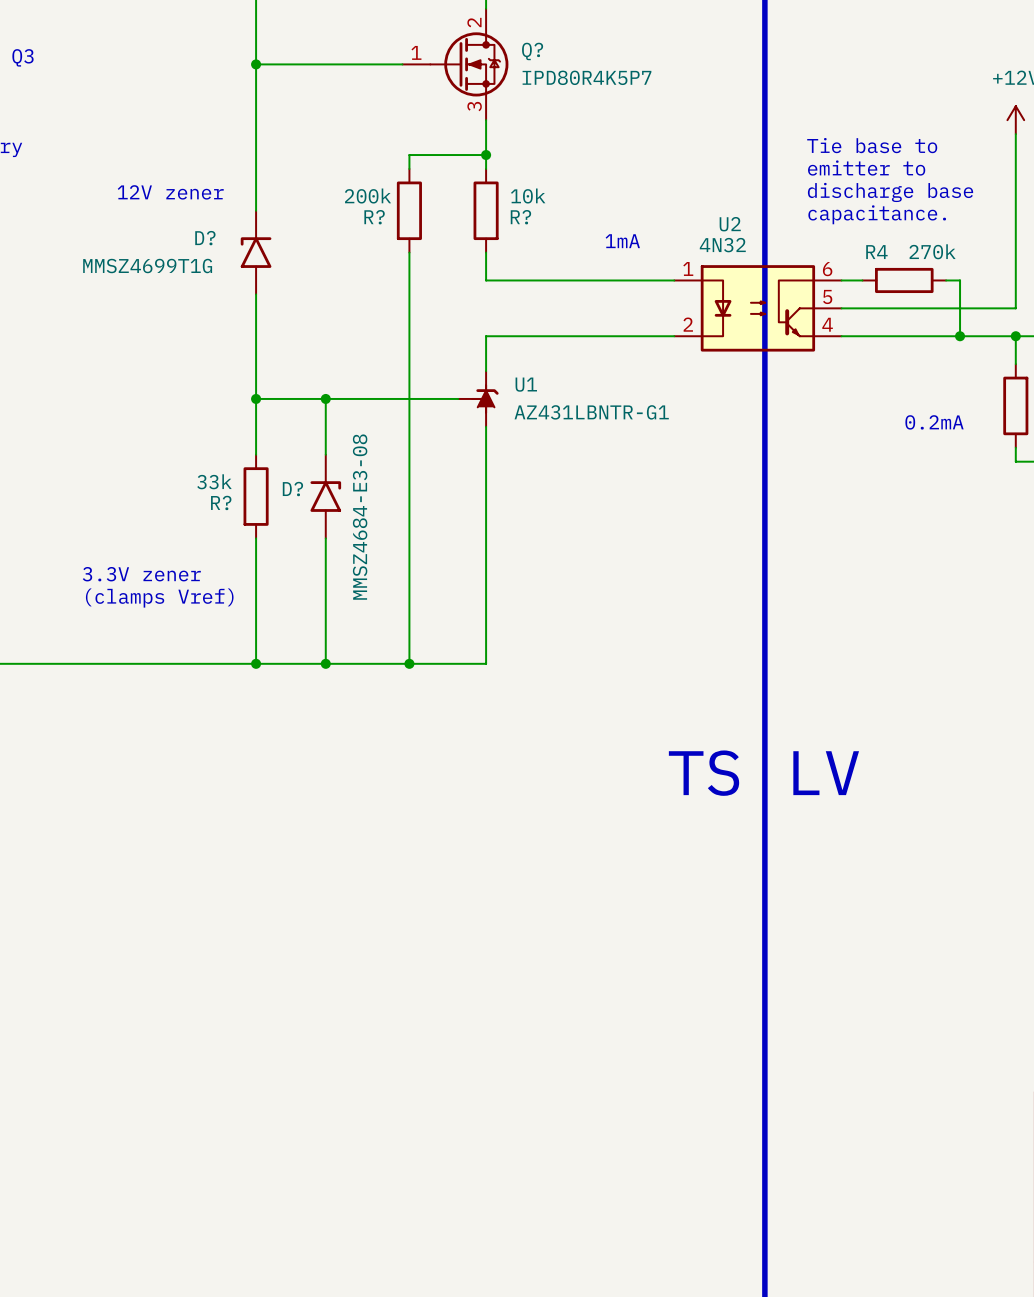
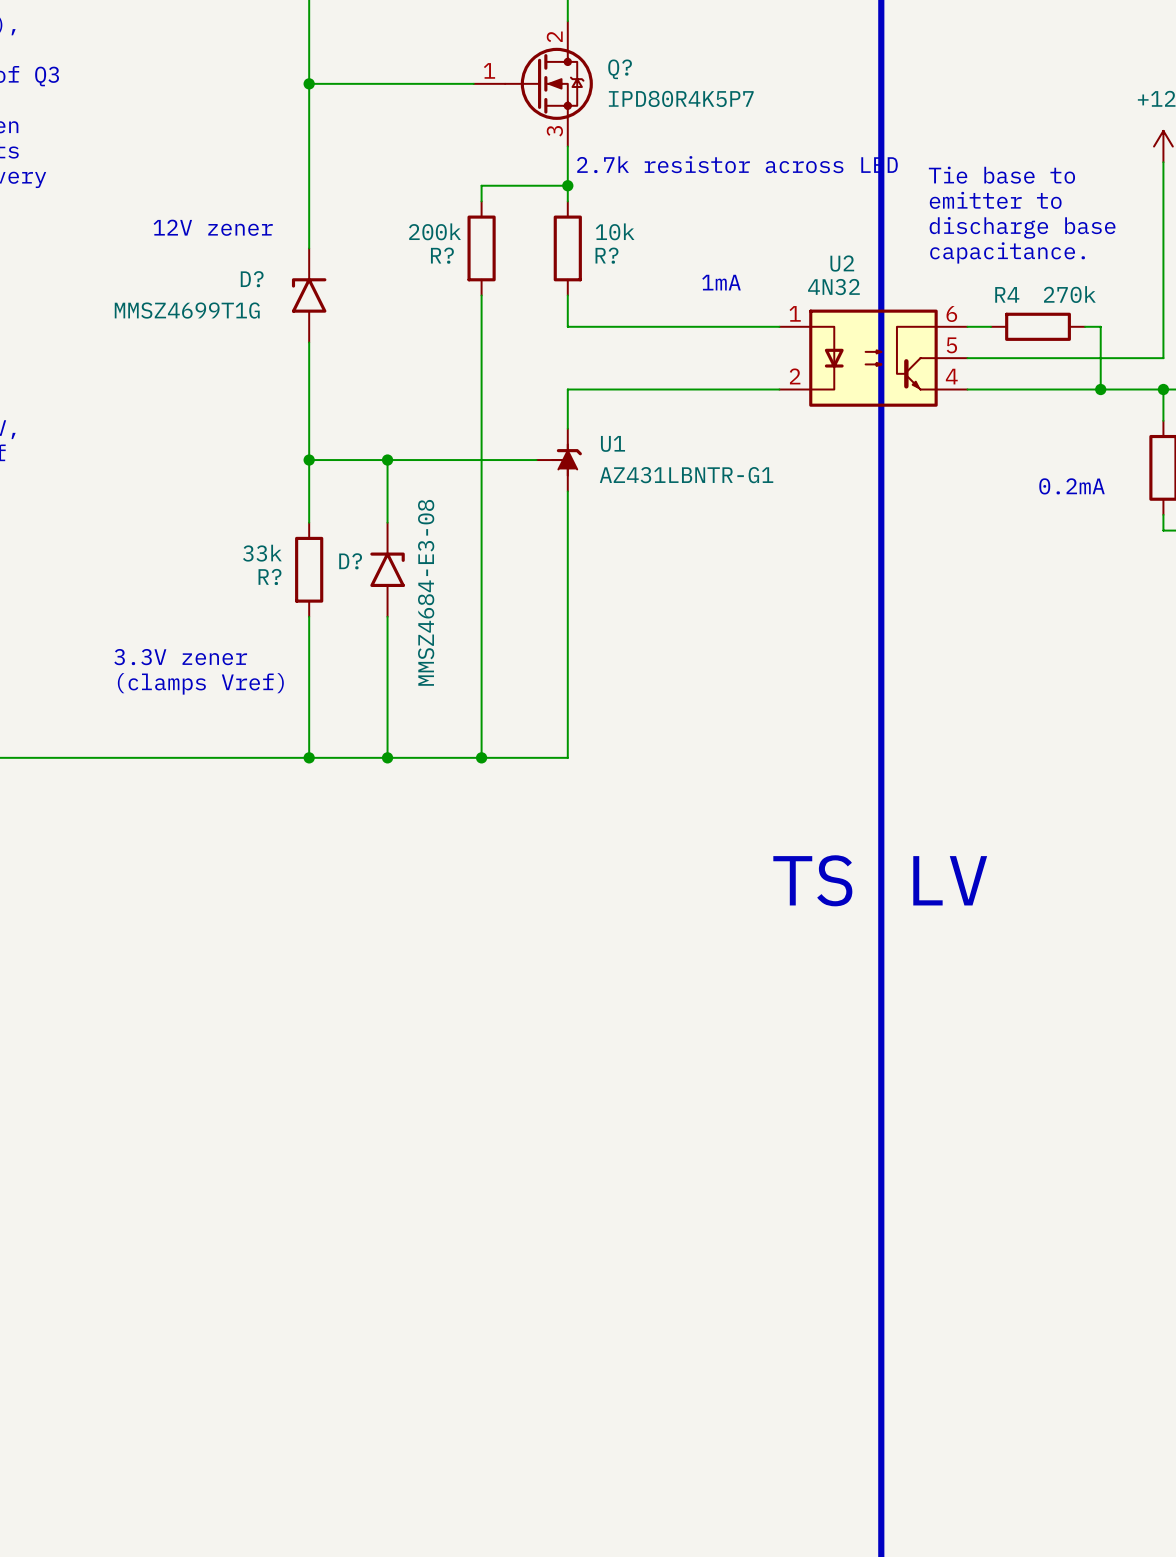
text: none -> 2.7k resistor across LED (737, 164)

